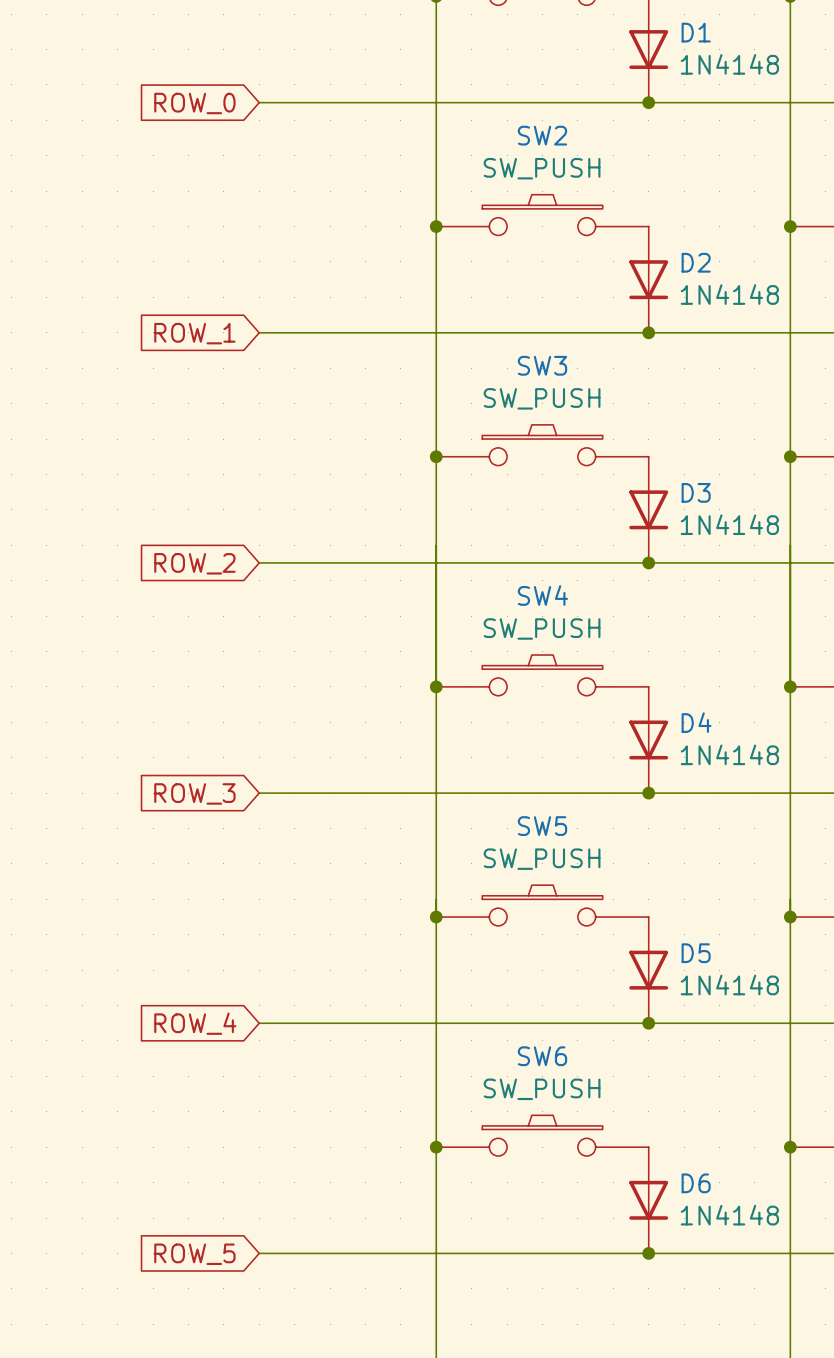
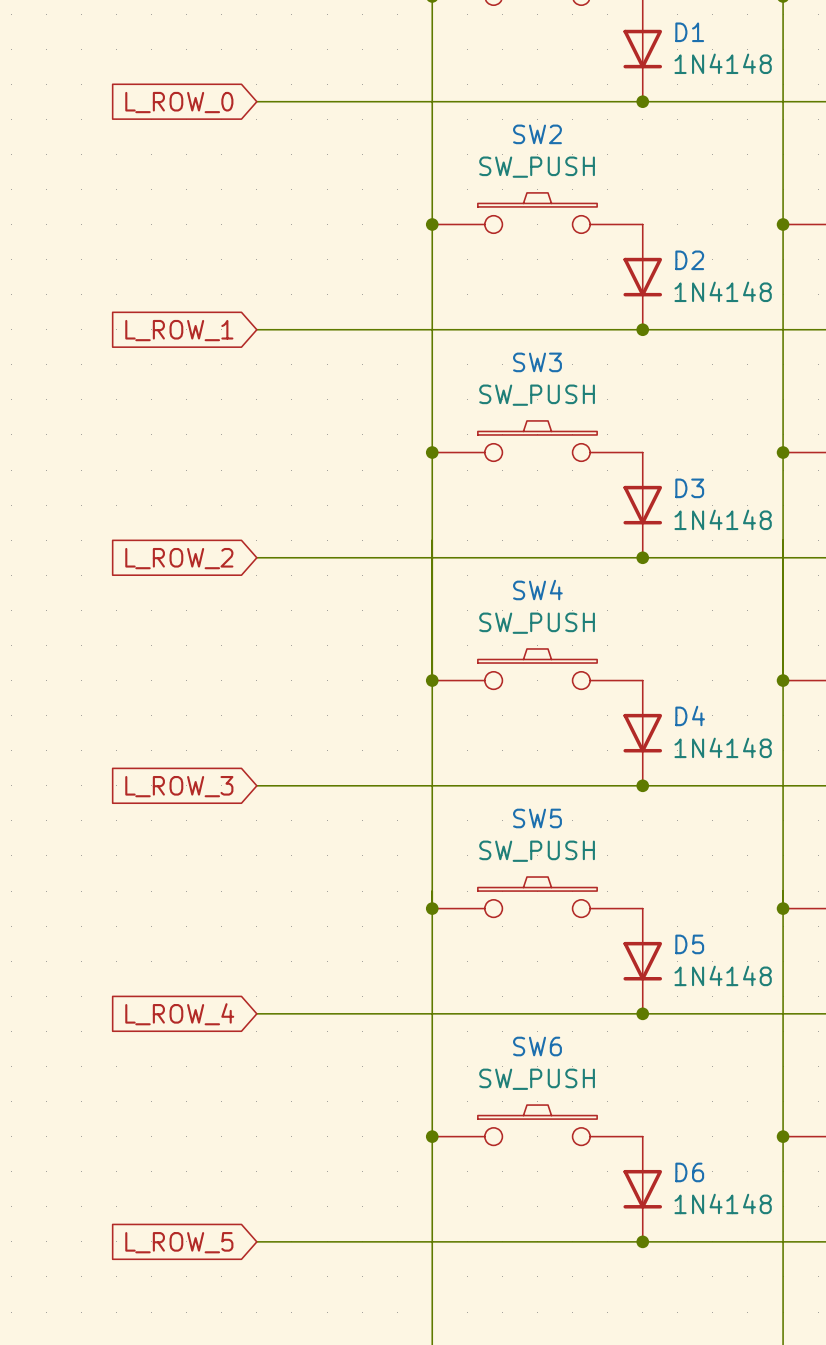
global label: ROW_0 (194, 103) -> L_ROW_0 (179, 102)
global label: ROW_1 (194, 333) -> L_ROW_1 (179, 330)
global label: ROW_2 (194, 563) -> L_ROW_2 (179, 558)
global label: ROW_3 (194, 793) -> L_ROW_3 (179, 786)
global label: ROW_4 (195, 1023) -> L_ROW_4 (179, 1014)
global label: ROW_5 (194, 1254) -> L_ROW_5 (179, 1242)

